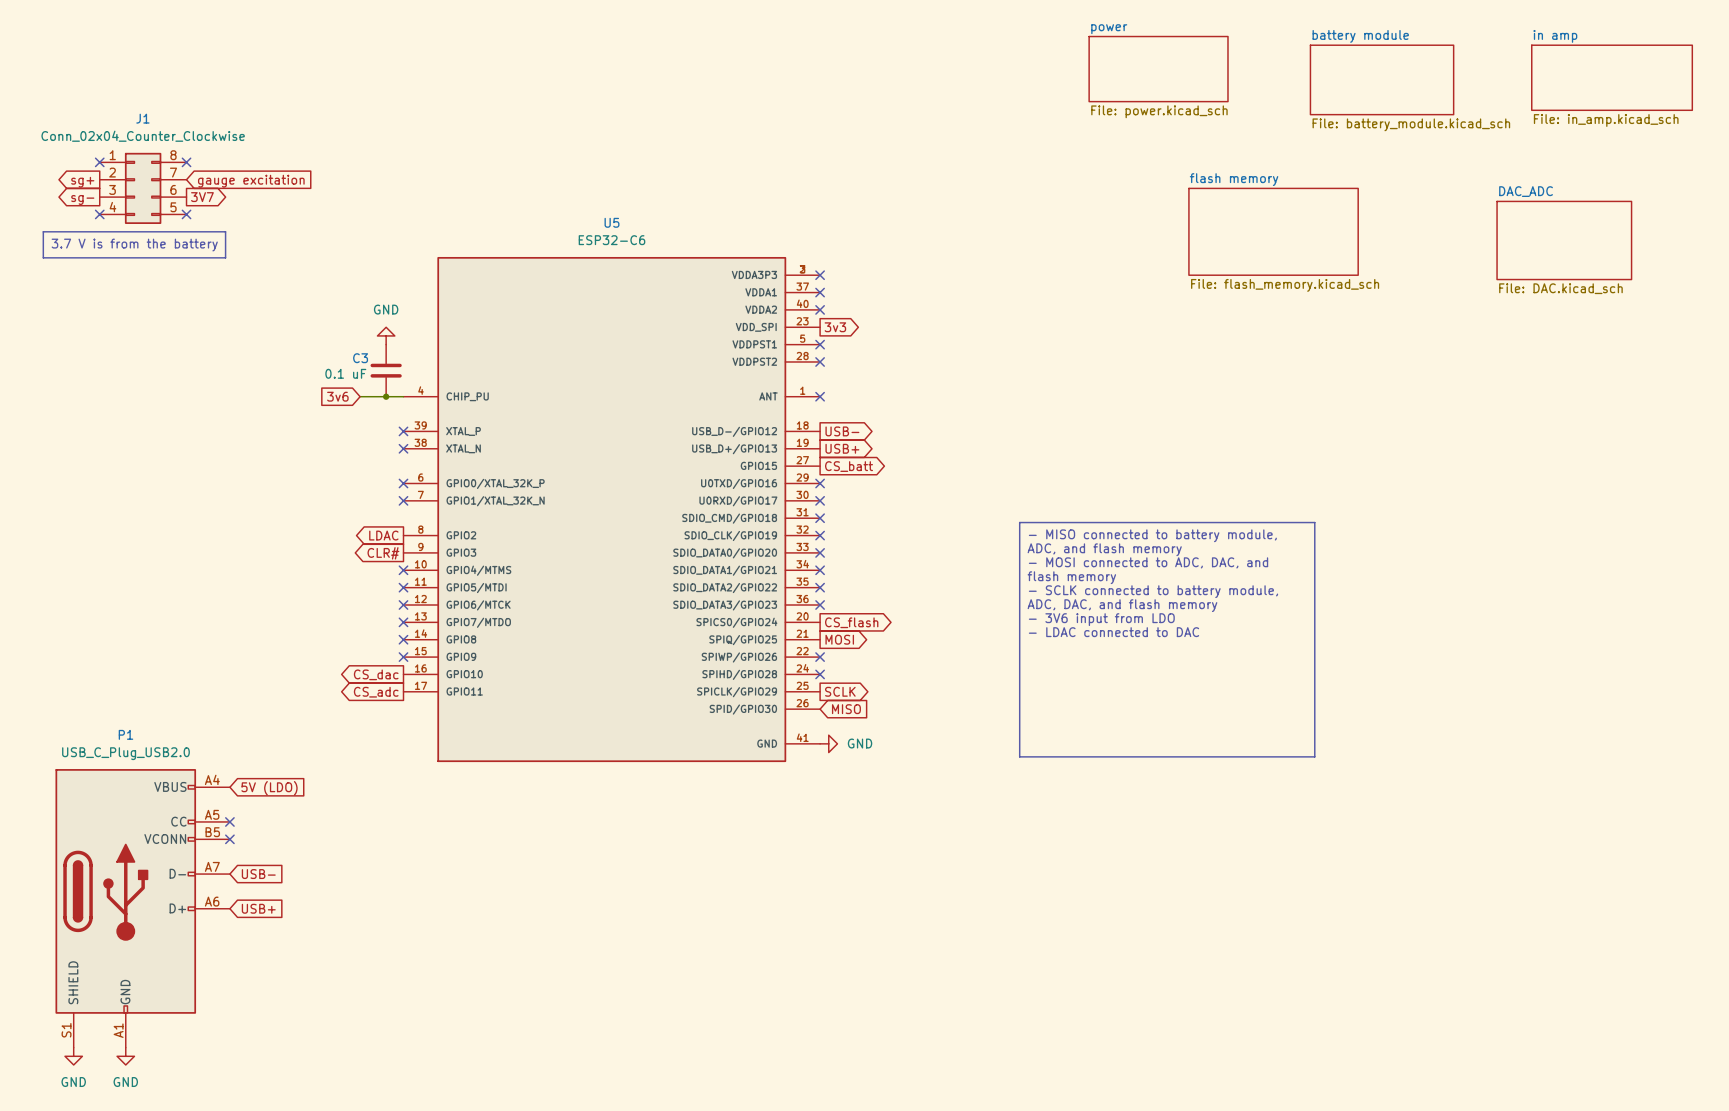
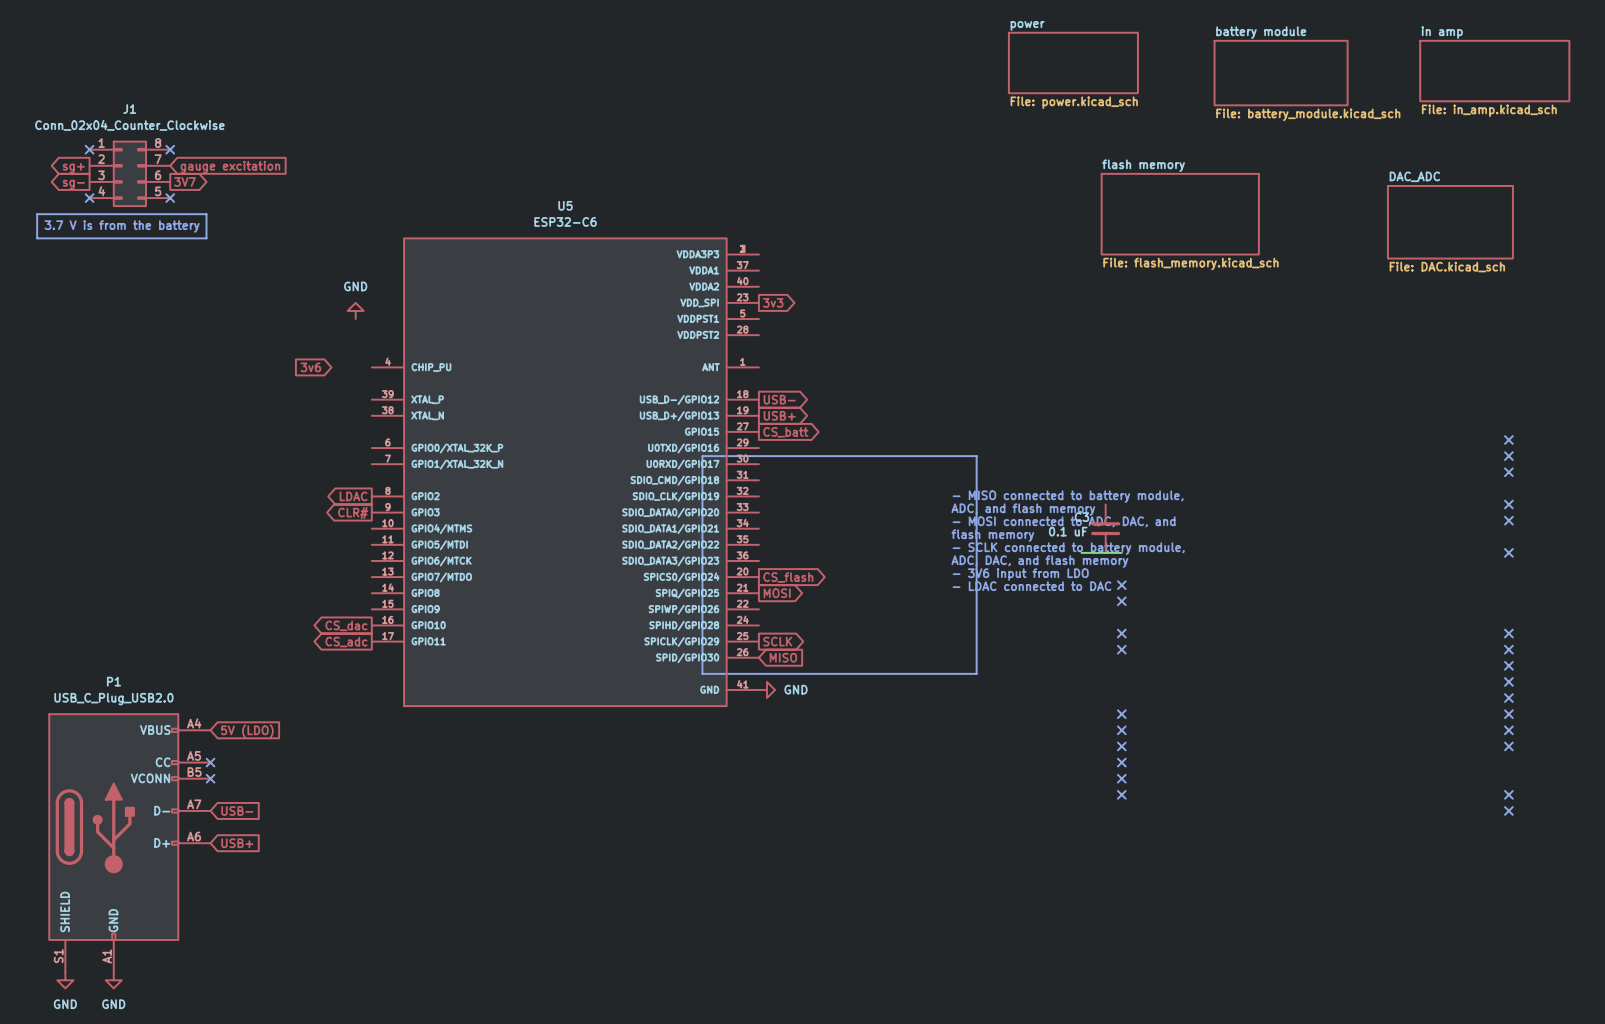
no-connect mark: (820, 275) -> none
no-connect mark: (820, 292) -> none
no-connect mark: (820, 309) -> none
no-connect mark: (820, 344) -> none
no-connect mark: (820, 361) -> none
C3 position: (386, 370) -> (1105, 528)
wire: (360, 396) (403, 396) -> none
junction: (386, 396) -> none
no-connect mark: (820, 396) -> none
no-connect mark: (403, 431) -> none
no-connect mark: (403, 448) -> none
no-connect mark: none -> (1508, 439)
no-connect mark: (403, 483) -> none
no-connect mark: (820, 483) -> none
line: none -> (702, 456) (976, 456) (976, 673) (702, 673) (702, 456)
no-connect mark: none -> (1508, 456)
no-connect mark: (403, 500) -> none
no-connect mark: (820, 500) -> none
no-connect mark: none -> (1508, 472)
no-connect mark: (820, 518) -> none
line: (1019, 522) (1314, 522) (1314, 756) (1019, 756) (1019, 522) -> none
no-connect mark: (820, 535) -> none
no-connect mark: none -> (1508, 504)
no-connect mark: (820, 552) -> none
no-connect mark: none -> (1508, 520)
no-connect mark: (403, 570) -> none
no-connect mark: (820, 570) -> none
no-connect mark: (403, 587) -> none
no-connect mark: (820, 587) -> none
wire: none -> (1081, 552) (1121, 552)
no-connect mark: none -> (1508, 552)
no-connect mark: (403, 605) -> none
no-connect mark: (820, 605) -> none
no-connect mark: (403, 622) -> none
no-connect mark: none -> (1121, 585)
no-connect mark: (403, 639) -> none
no-connect mark: none -> (1121, 601)
no-connect mark: (403, 657) -> none
no-connect mark: (820, 657) -> none
no-connect mark: (820, 674) -> none
no-connect mark: none -> (1121, 633)
no-connect mark: none -> (1508, 633)
no-connect mark: none -> (1121, 649)
no-connect mark: none -> (1508, 649)
no-connect mark: none -> (1508, 665)
no-connect mark: none -> (1508, 681)
no-connect mark: none -> (1508, 698)
no-connect mark: none -> (1121, 714)
no-connect mark: none -> (1508, 714)
no-connect mark: none -> (1121, 730)
no-connect mark: none -> (1508, 730)
no-connect mark: none -> (1121, 746)
no-connect mark: none -> (1508, 746)
no-connect mark: none -> (1121, 762)
no-connect mark: none -> (1121, 778)
no-connect mark: none -> (1121, 794)
no-connect mark: none -> (1508, 794)
no-connect mark: none -> (1508, 810)

